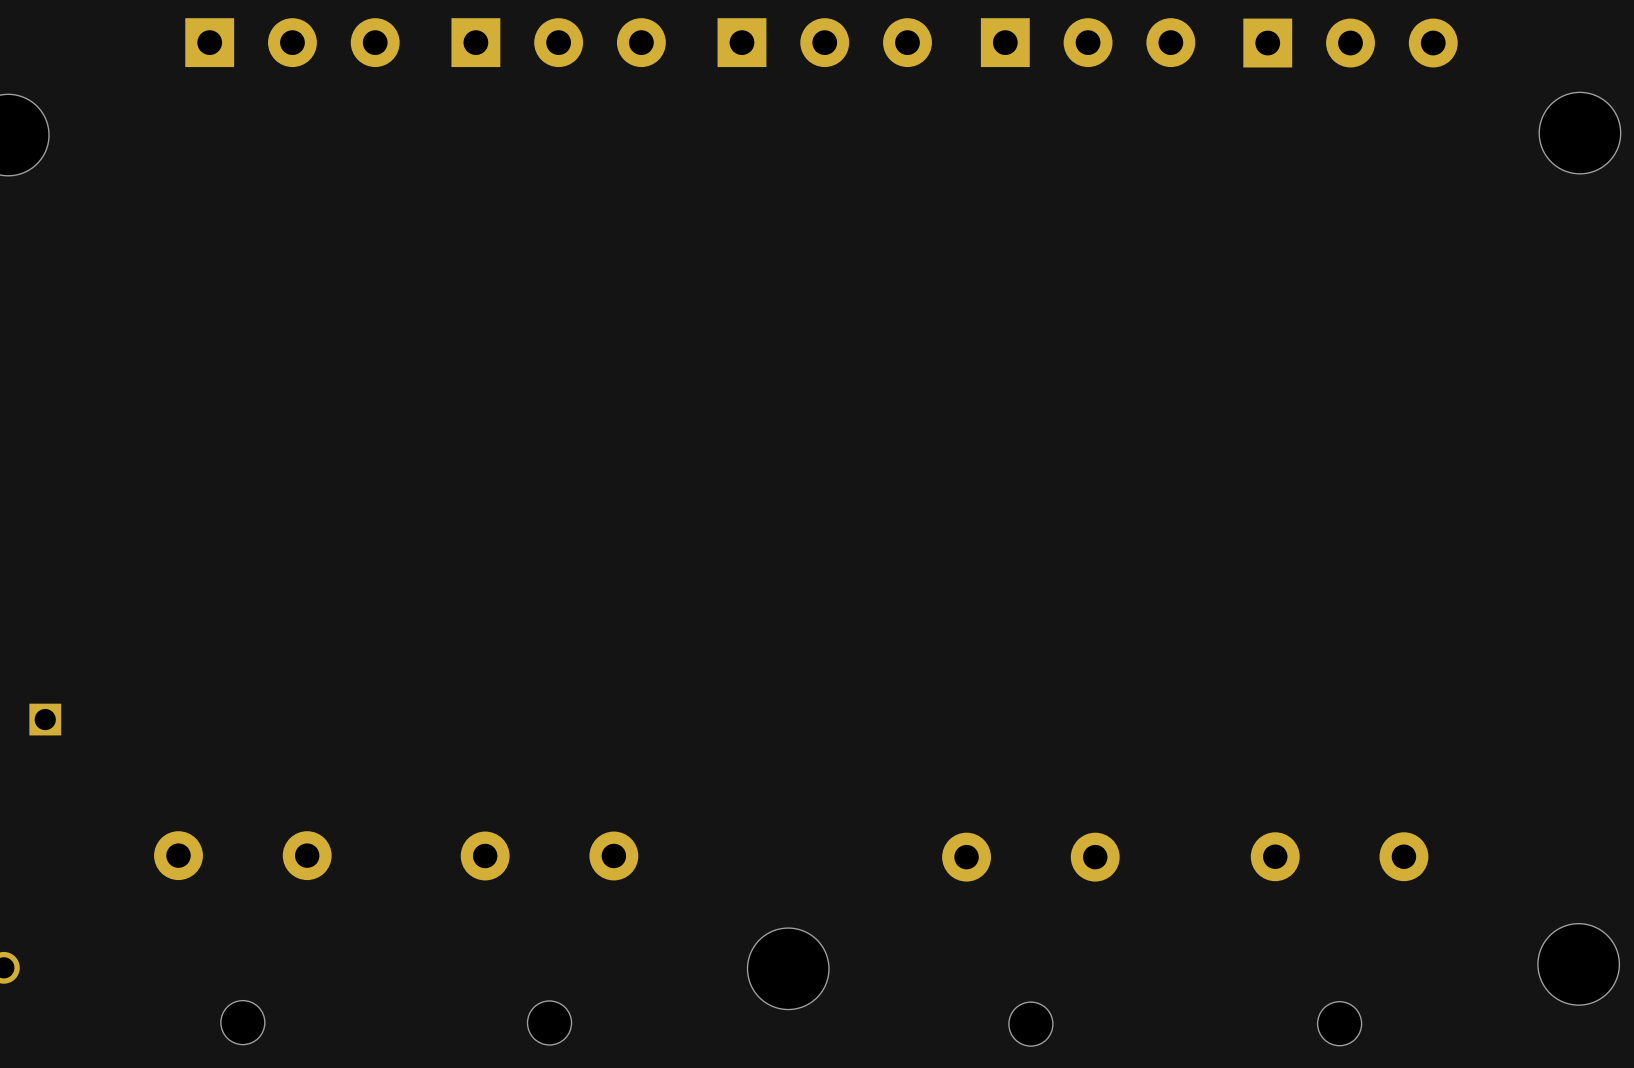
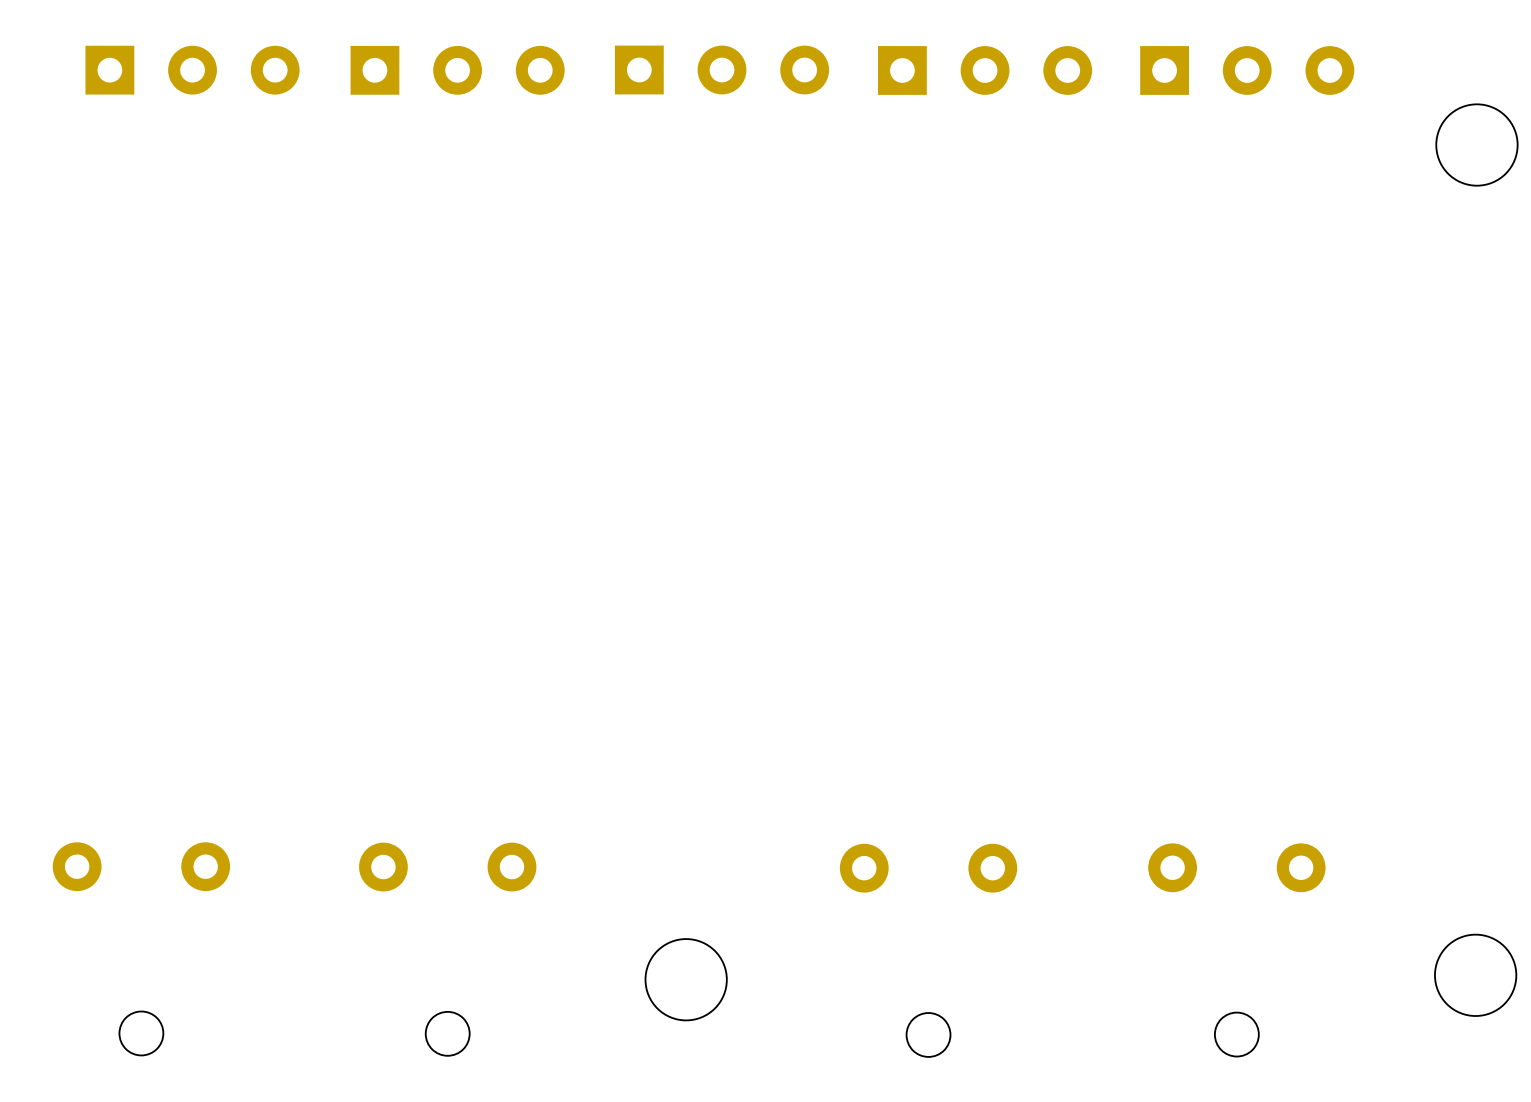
part position: (292, 42) -> (192, 70)
part position: (558, 42) -> (457, 70)
part position: (824, 42) -> (722, 69)
part position: (1088, 42) -> (985, 70)
part position: (1350, 43) -> (1247, 70)

